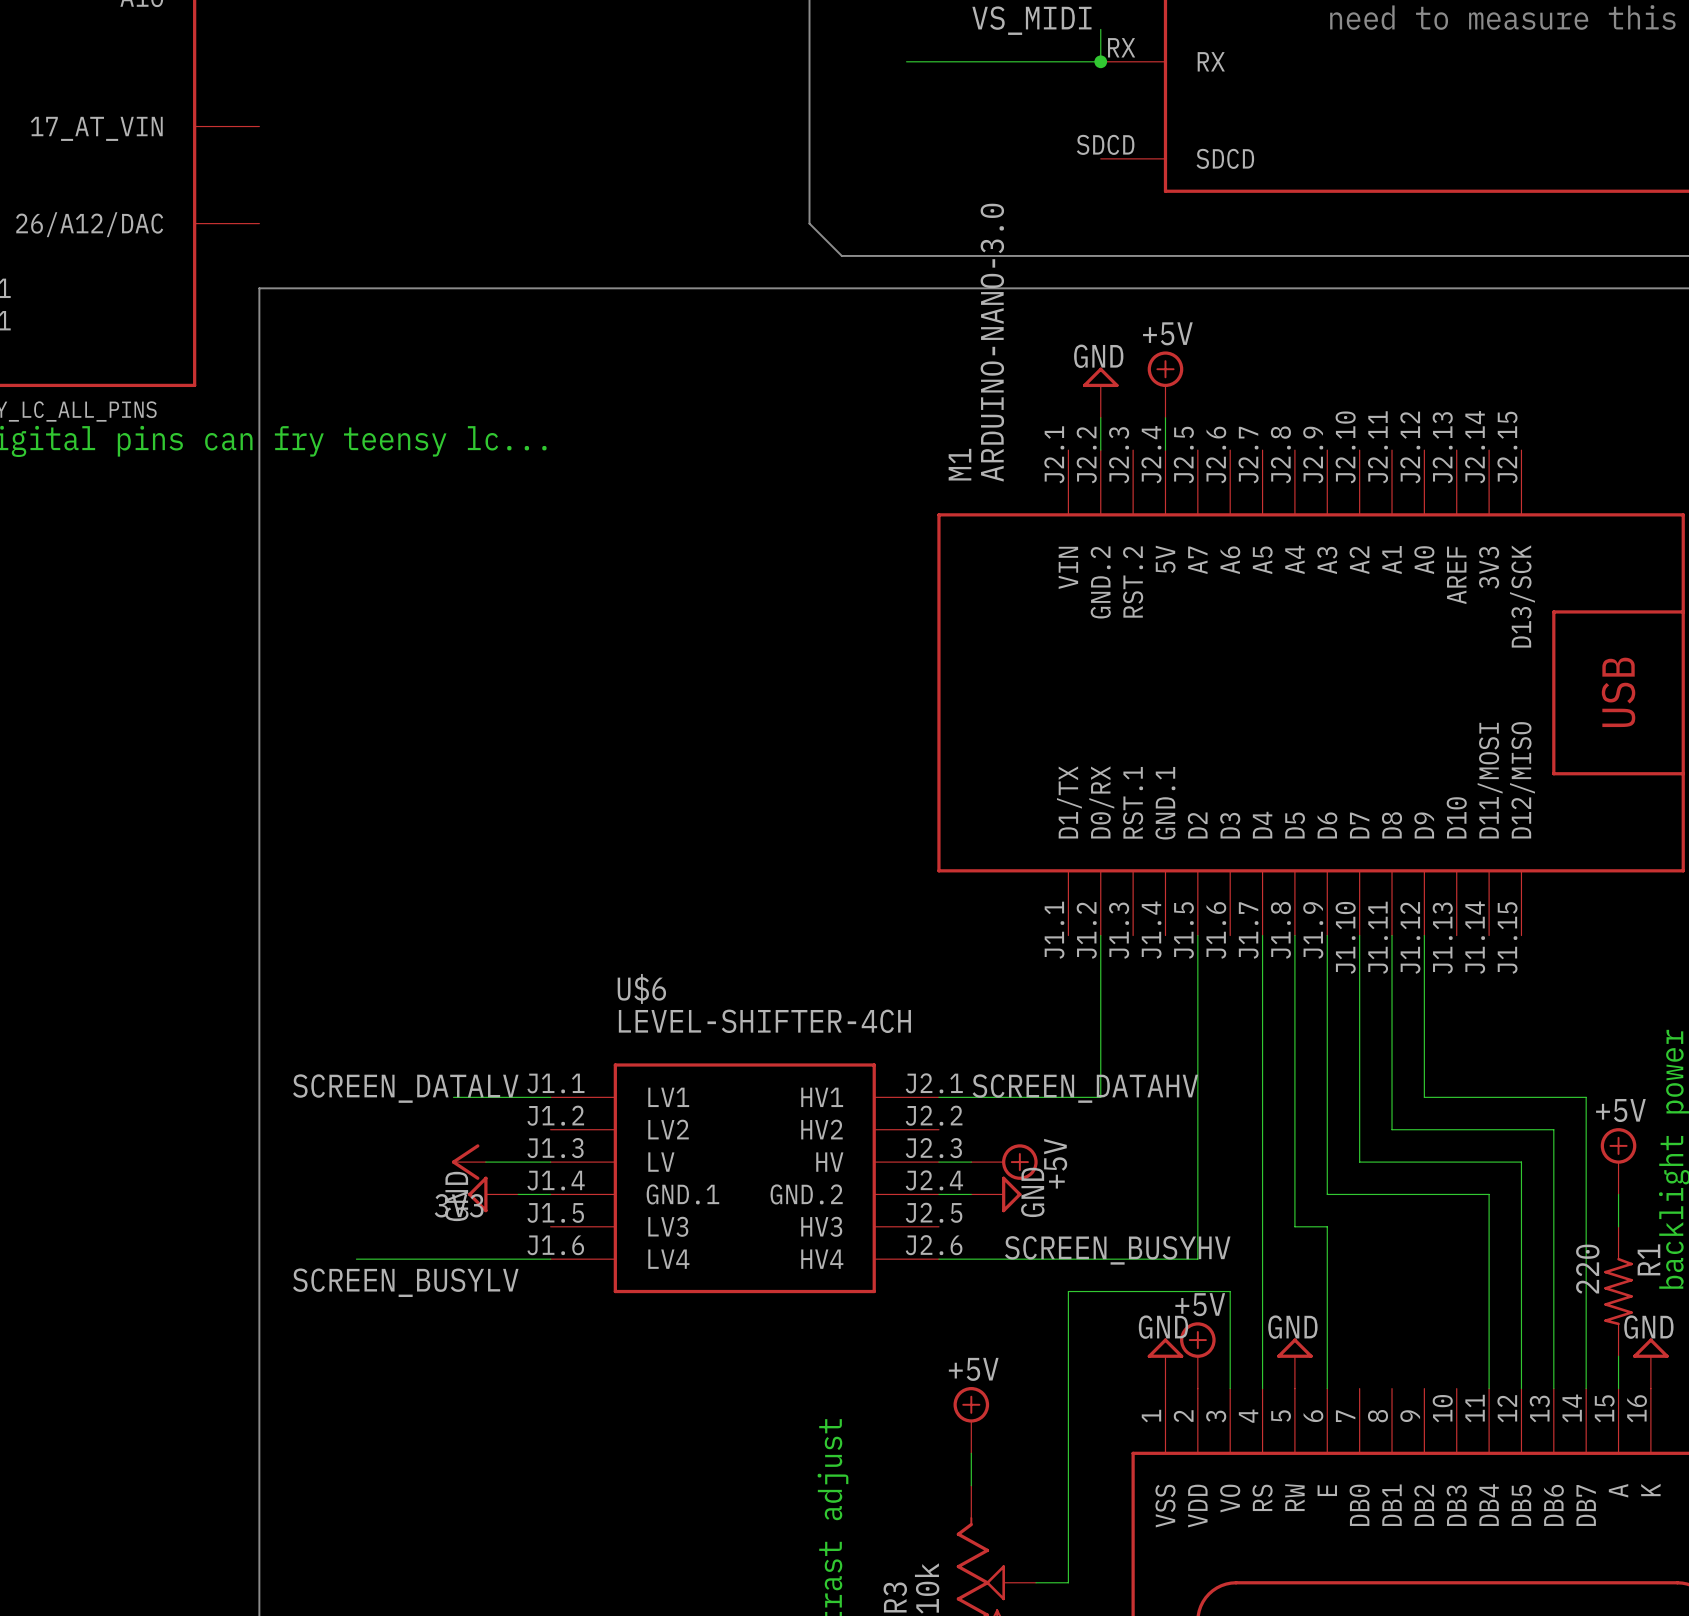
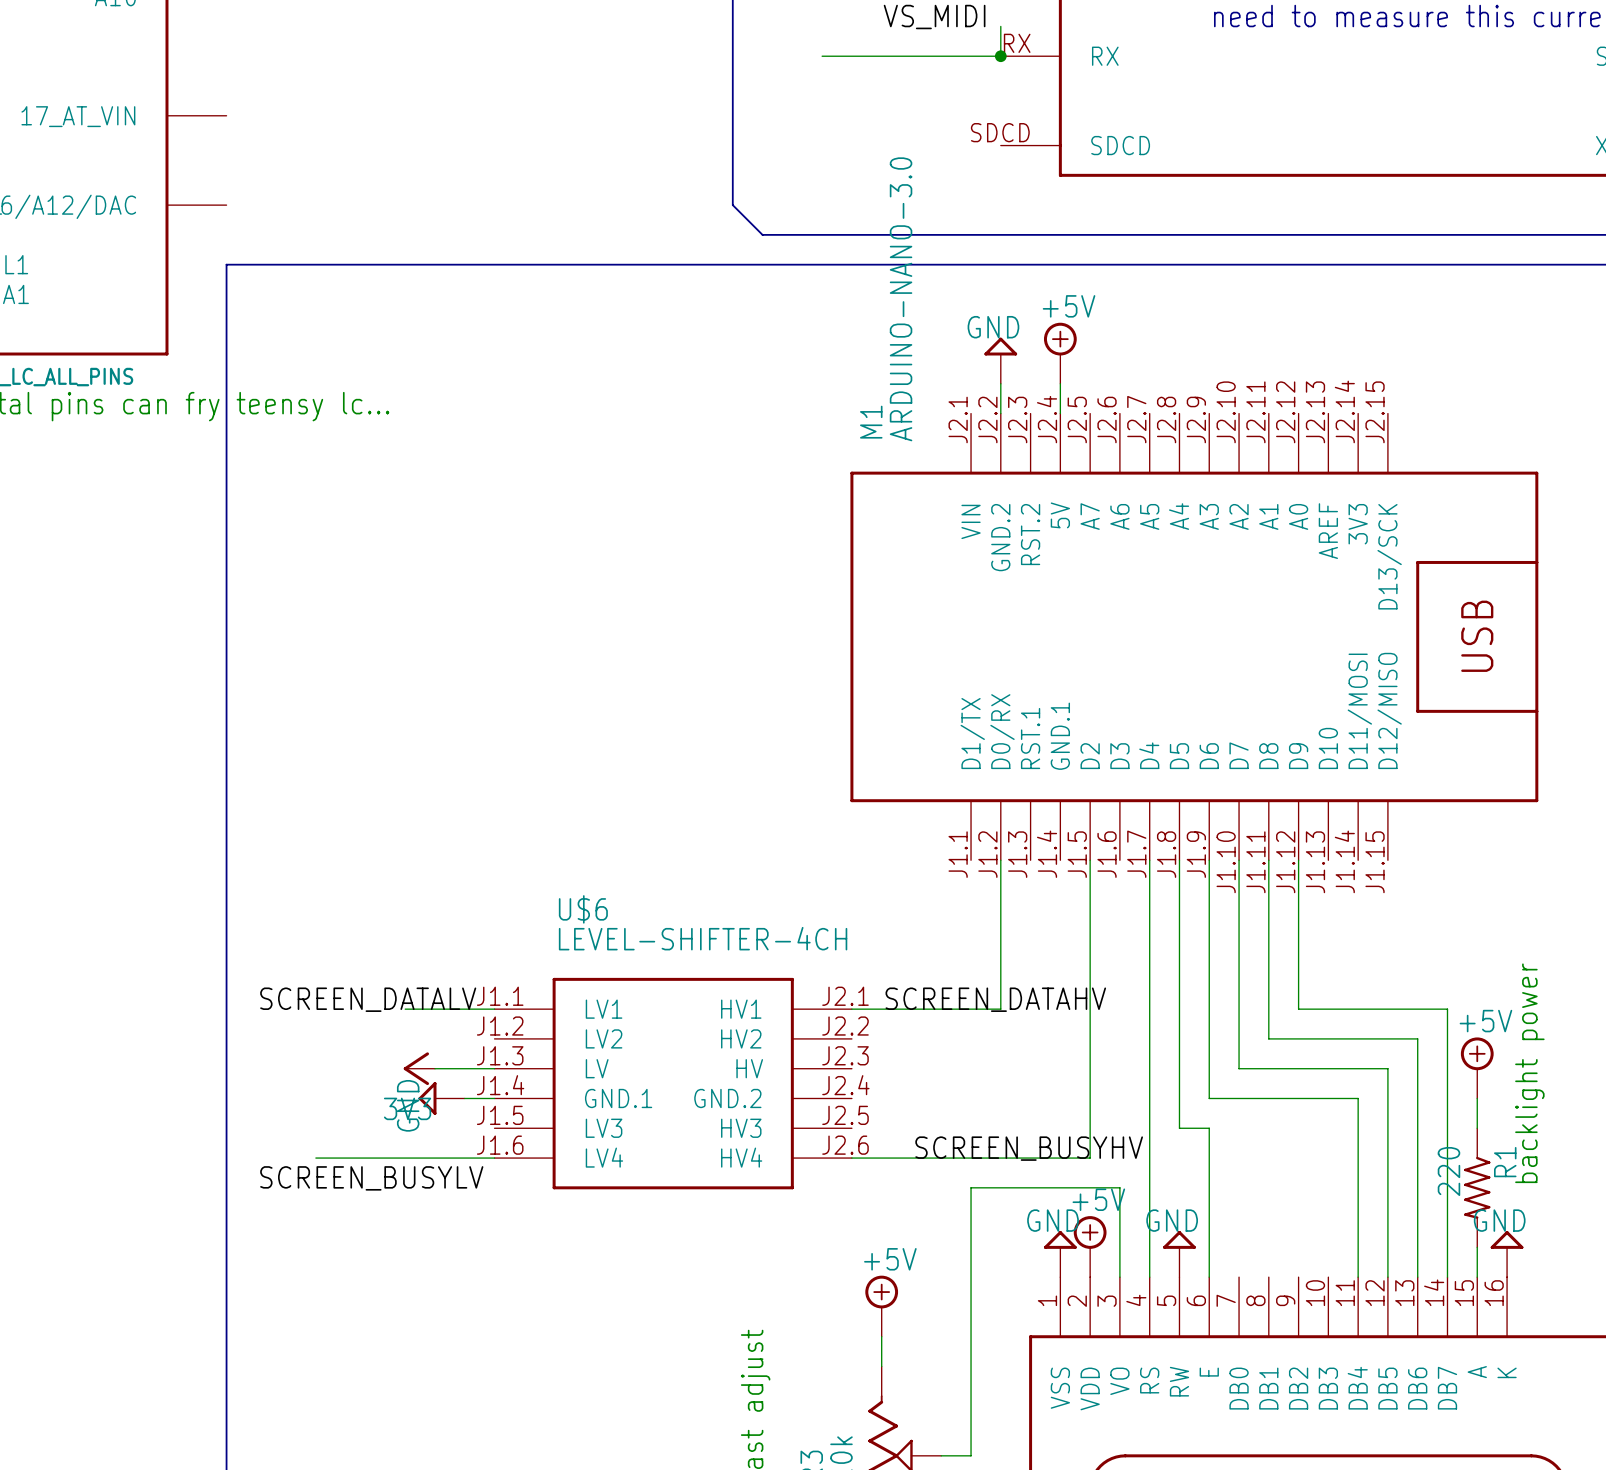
wire: (938, 1162) (971, 1162) -> none
power symbol: +5V (1004, 1162) -> none
wire: (938, 1194) (971, 1194) -> none
power symbol: GND (996, 1194) -> none

